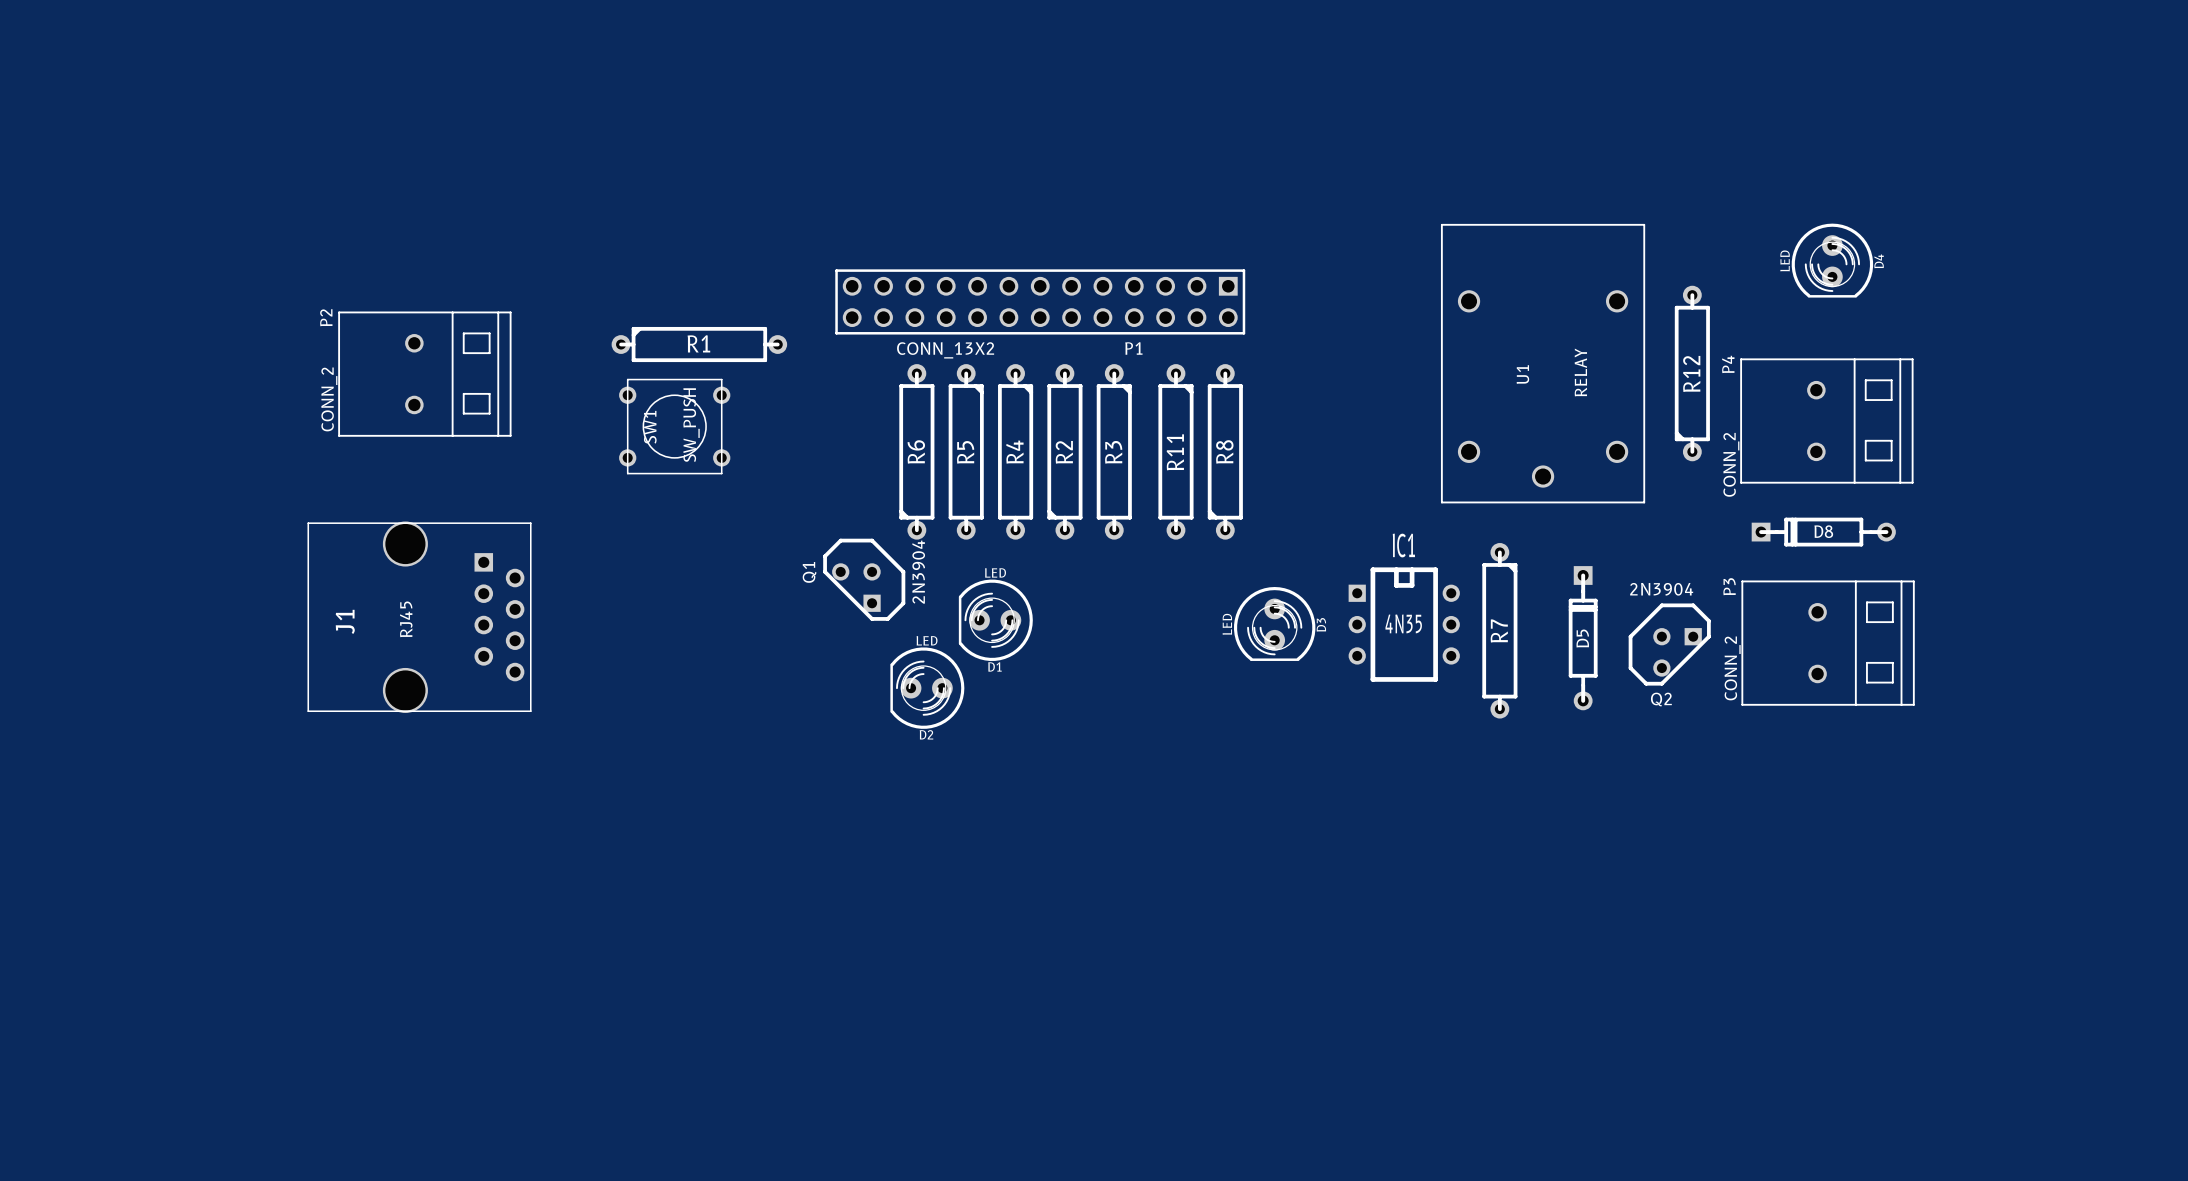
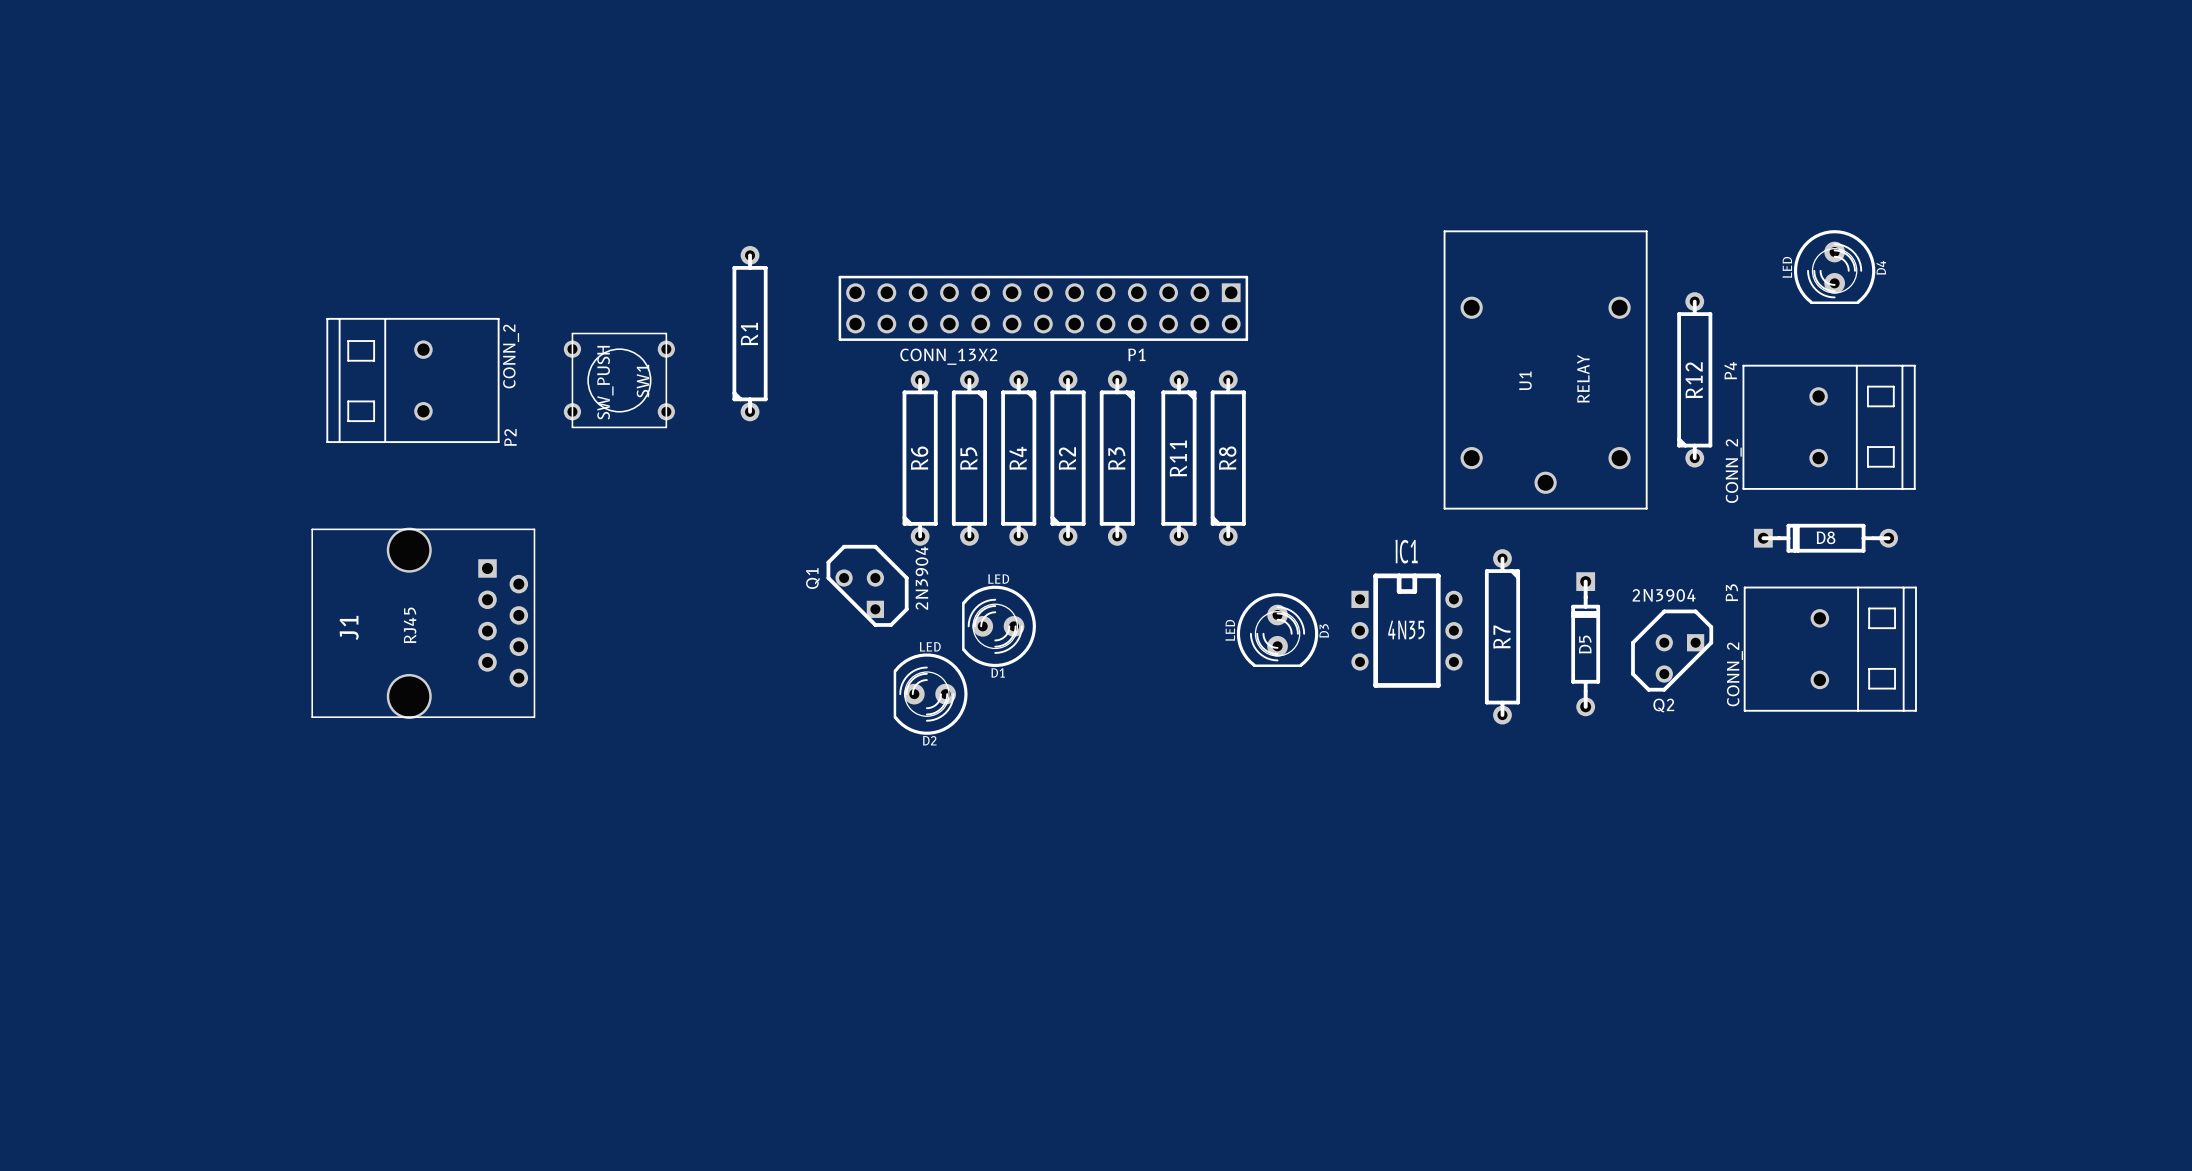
R1 rotation: 0° (699, 344) -> 90° counterclockwise (750, 333)
P2 rotation: 0° (424, 374) -> 180° (412, 380)
SW1 value position: SW_PUSH (691, 425) -> SW_PUSH (605, 382)
SW1 position: (674, 426) -> (619, 380)
SW1 name position: SW1 (650, 427) -> SW1 (643, 381)

